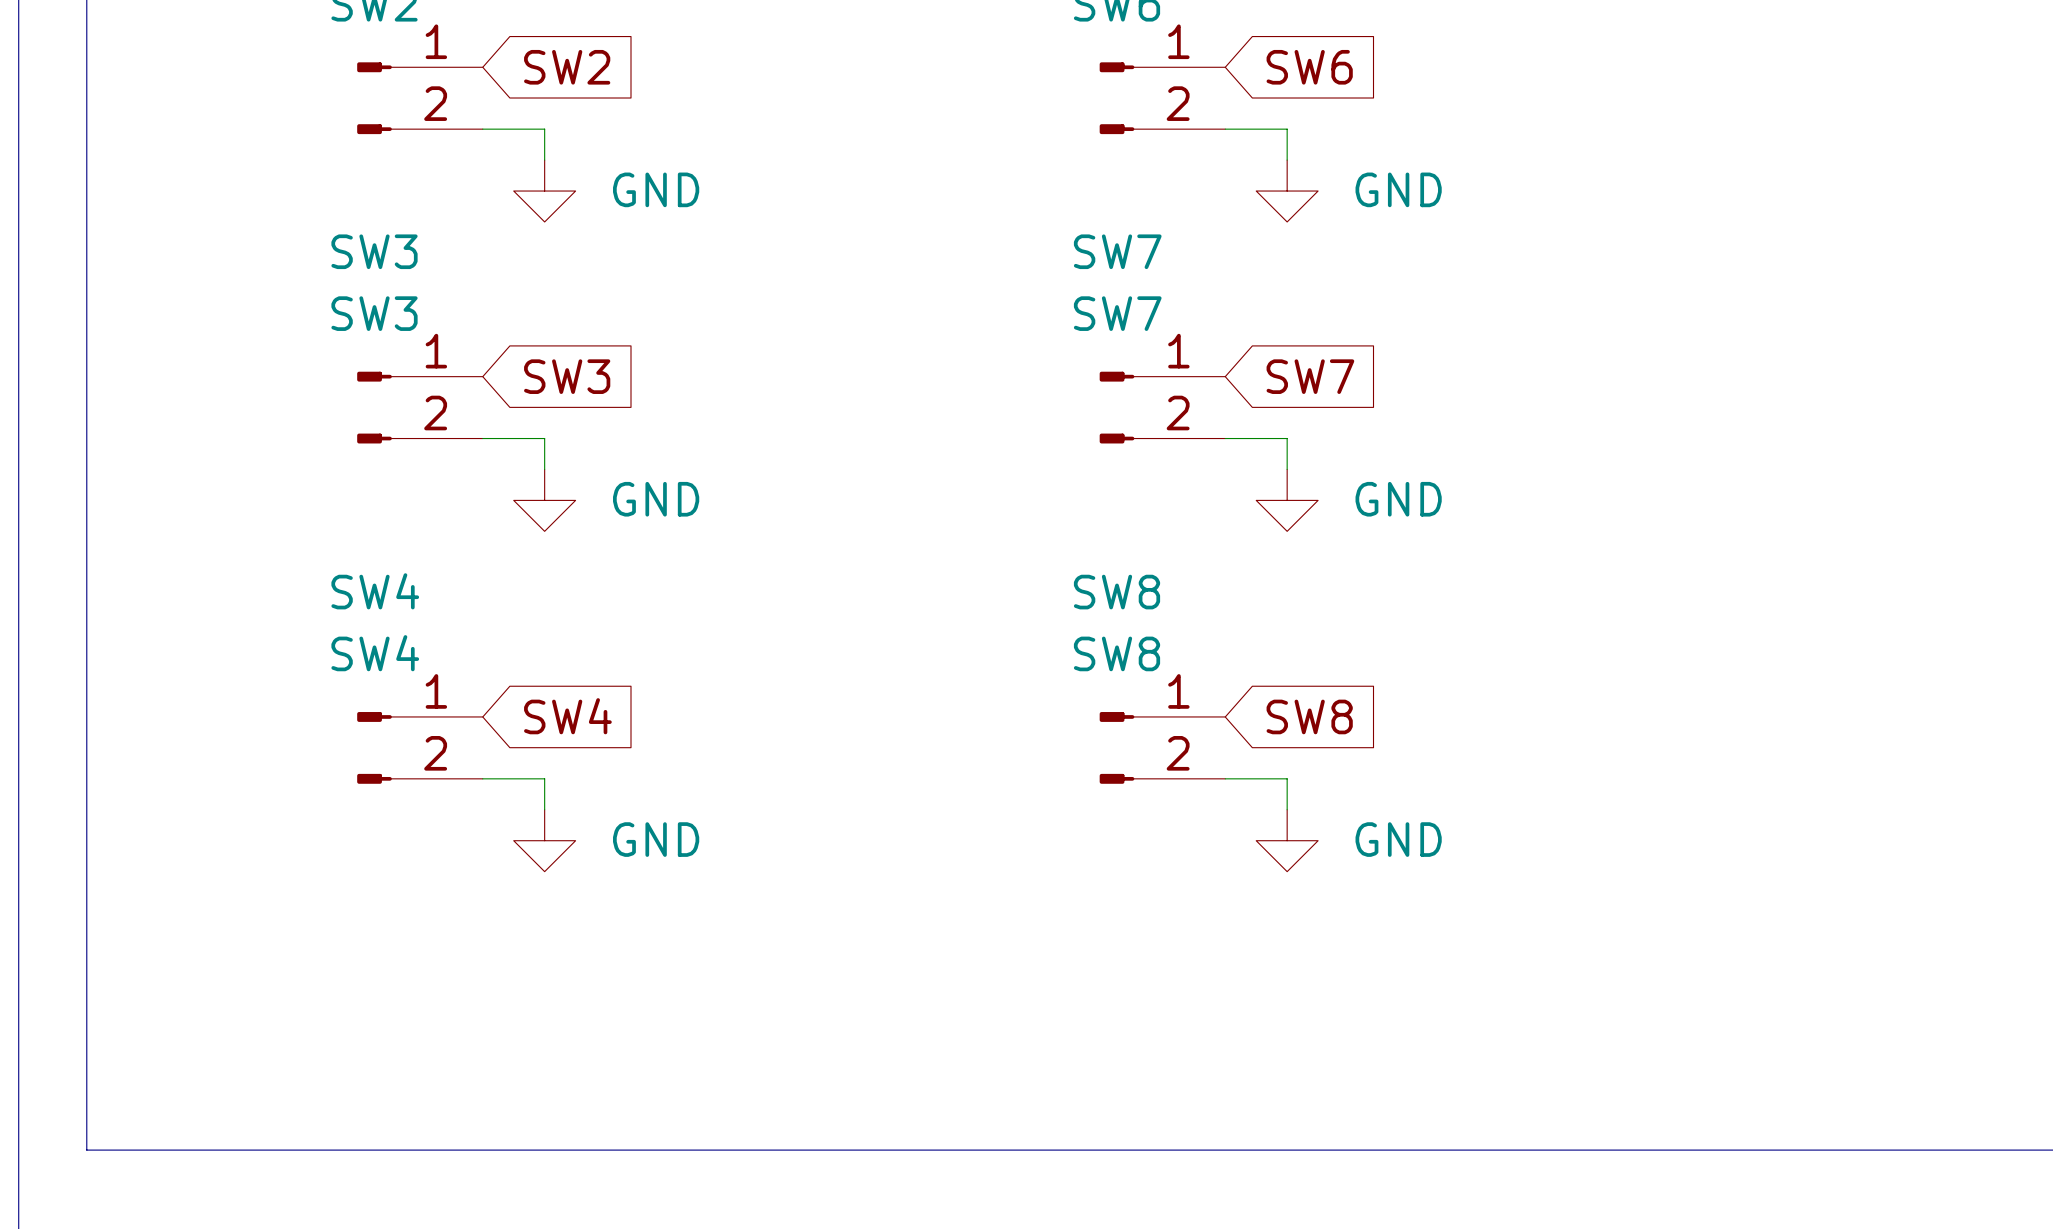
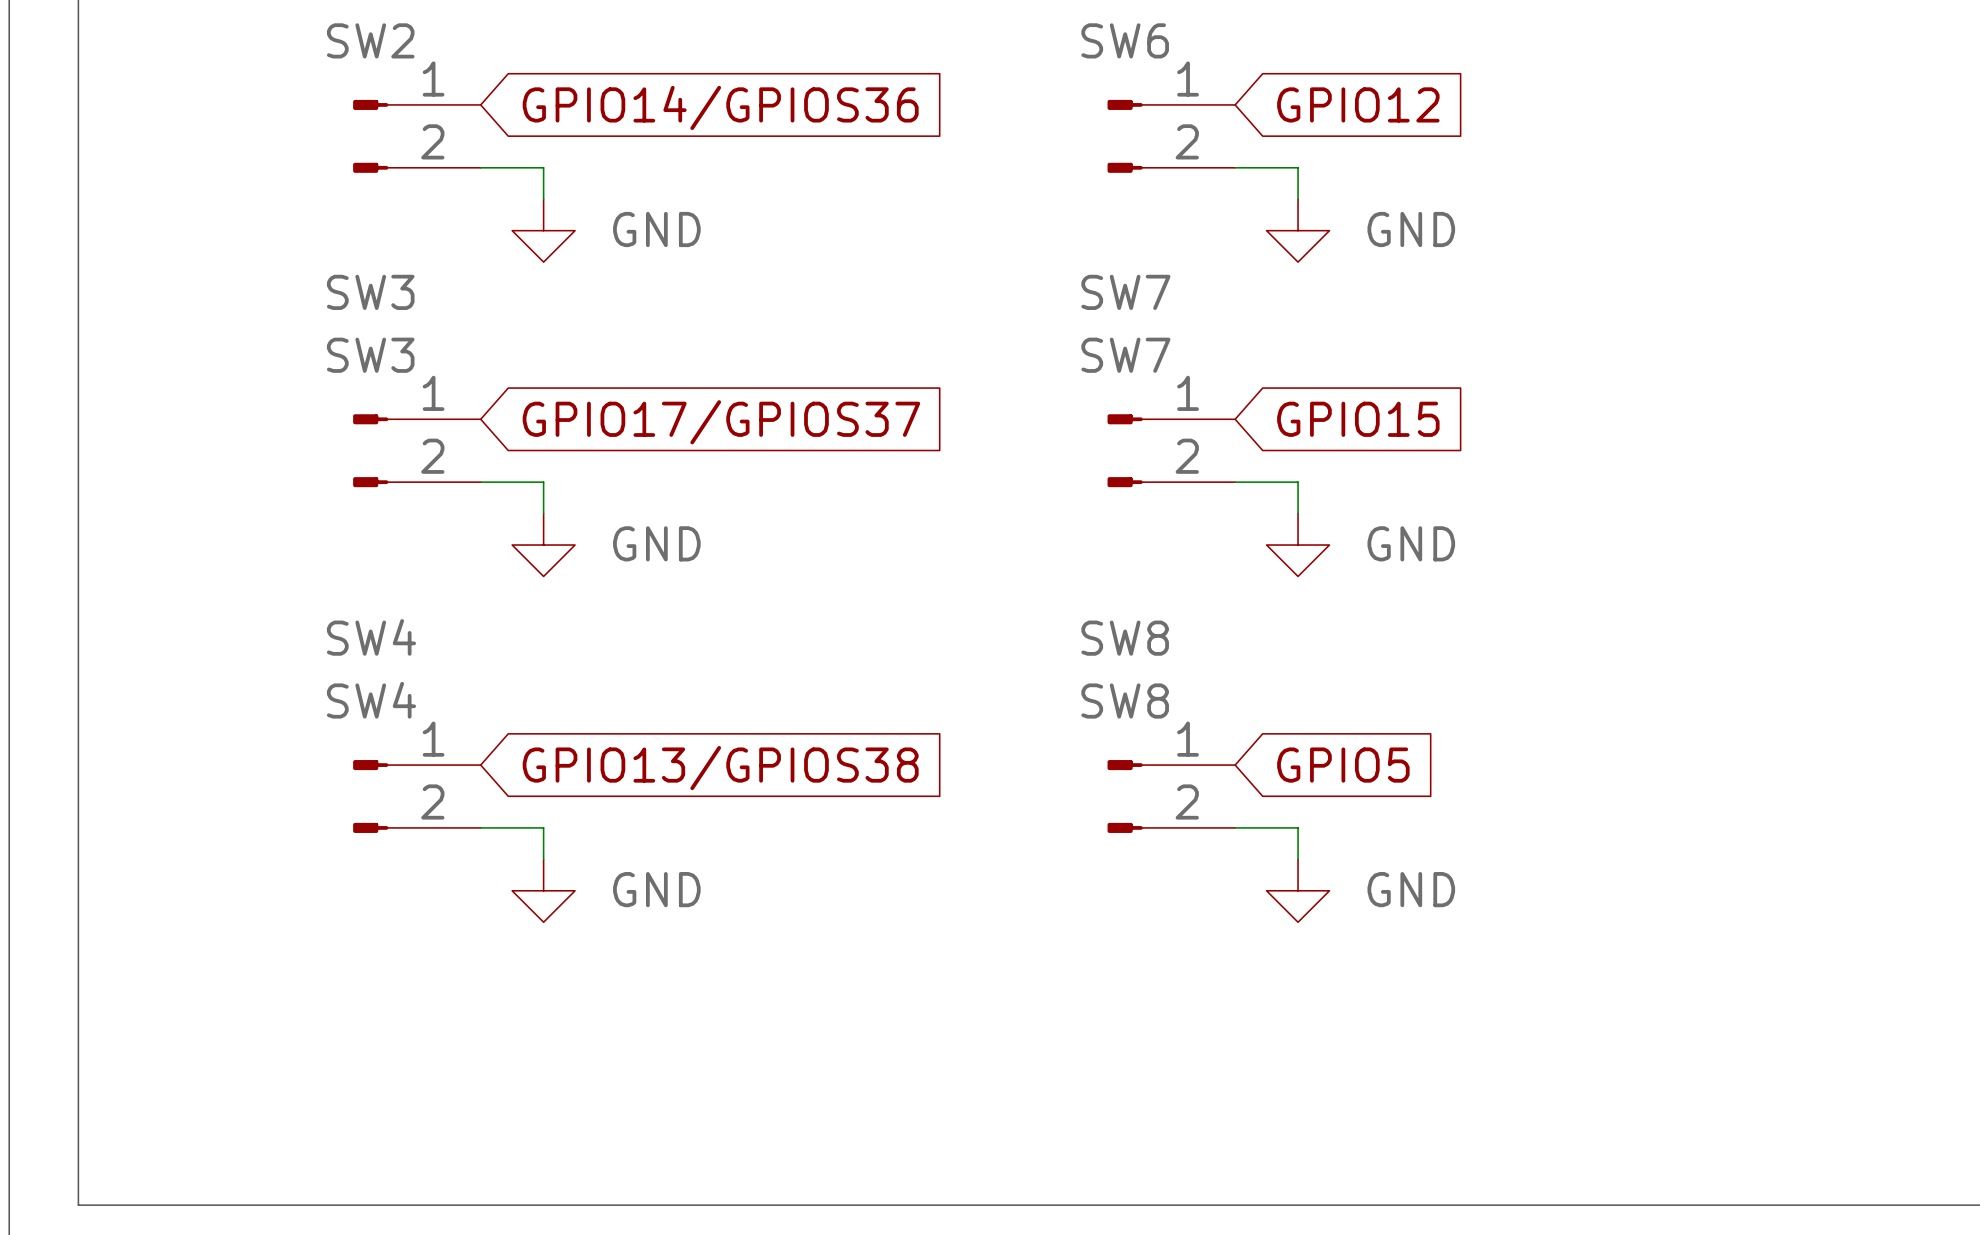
global label: SW2 (567, 67) -> GPIO14/GPIOS36 (720, 107)
global label: SW6 (1309, 67) -> GPIO12 (1358, 104)
global label: SW3 (567, 376) -> GPIO17/GPIOS37 (721, 422)
global label: SW7 (1310, 376) -> GPIO15 (1358, 419)
global label: SW4 (567, 716) -> GPIO13/GPIOS38 (720, 768)
global label: SW8 (1309, 716) -> GPIO5 (1343, 765)

